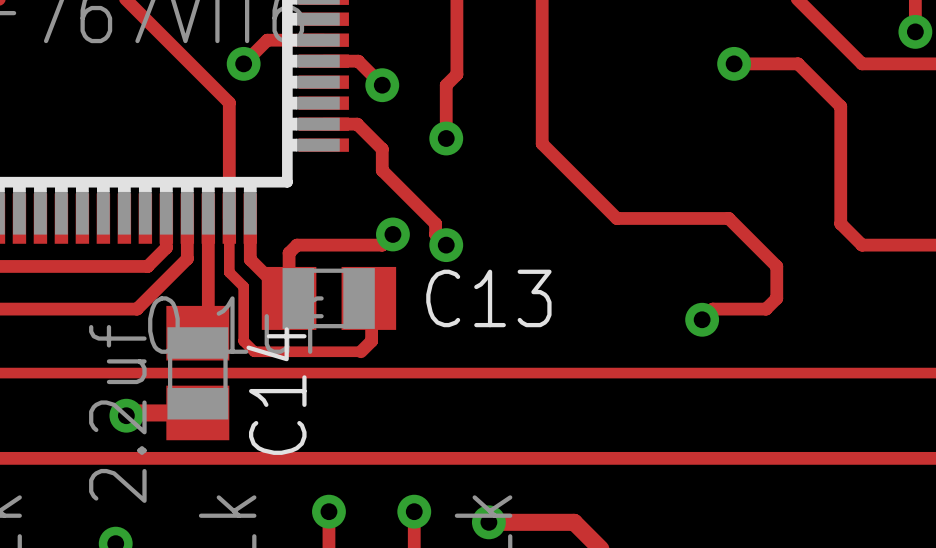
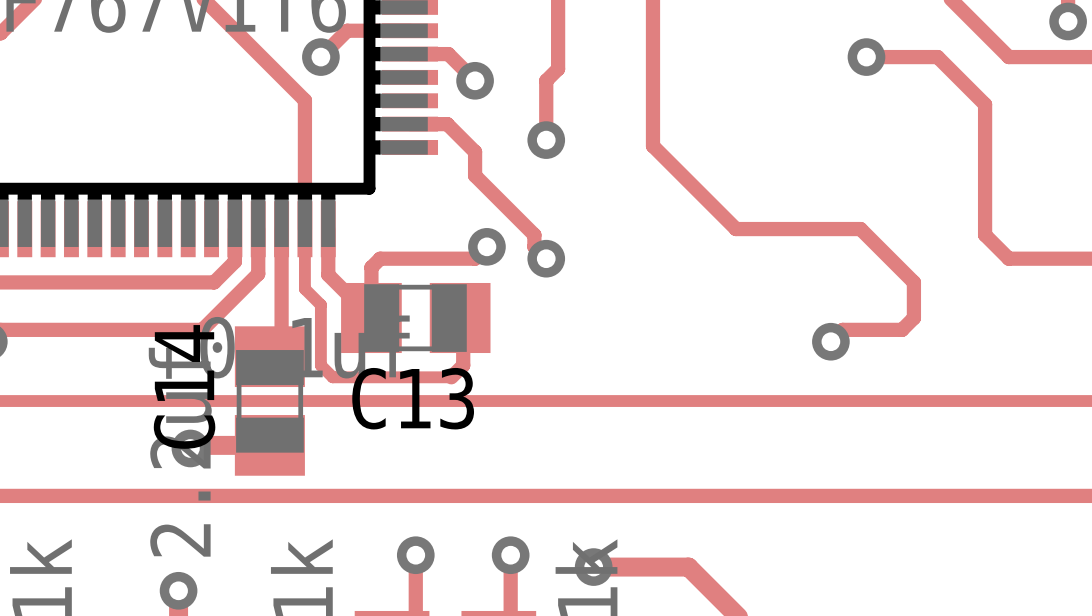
C13 name position: C13 (488, 298) -> C13 (413, 398)
C14 name position: C14 (276, 391) -> C14 (184, 386)

